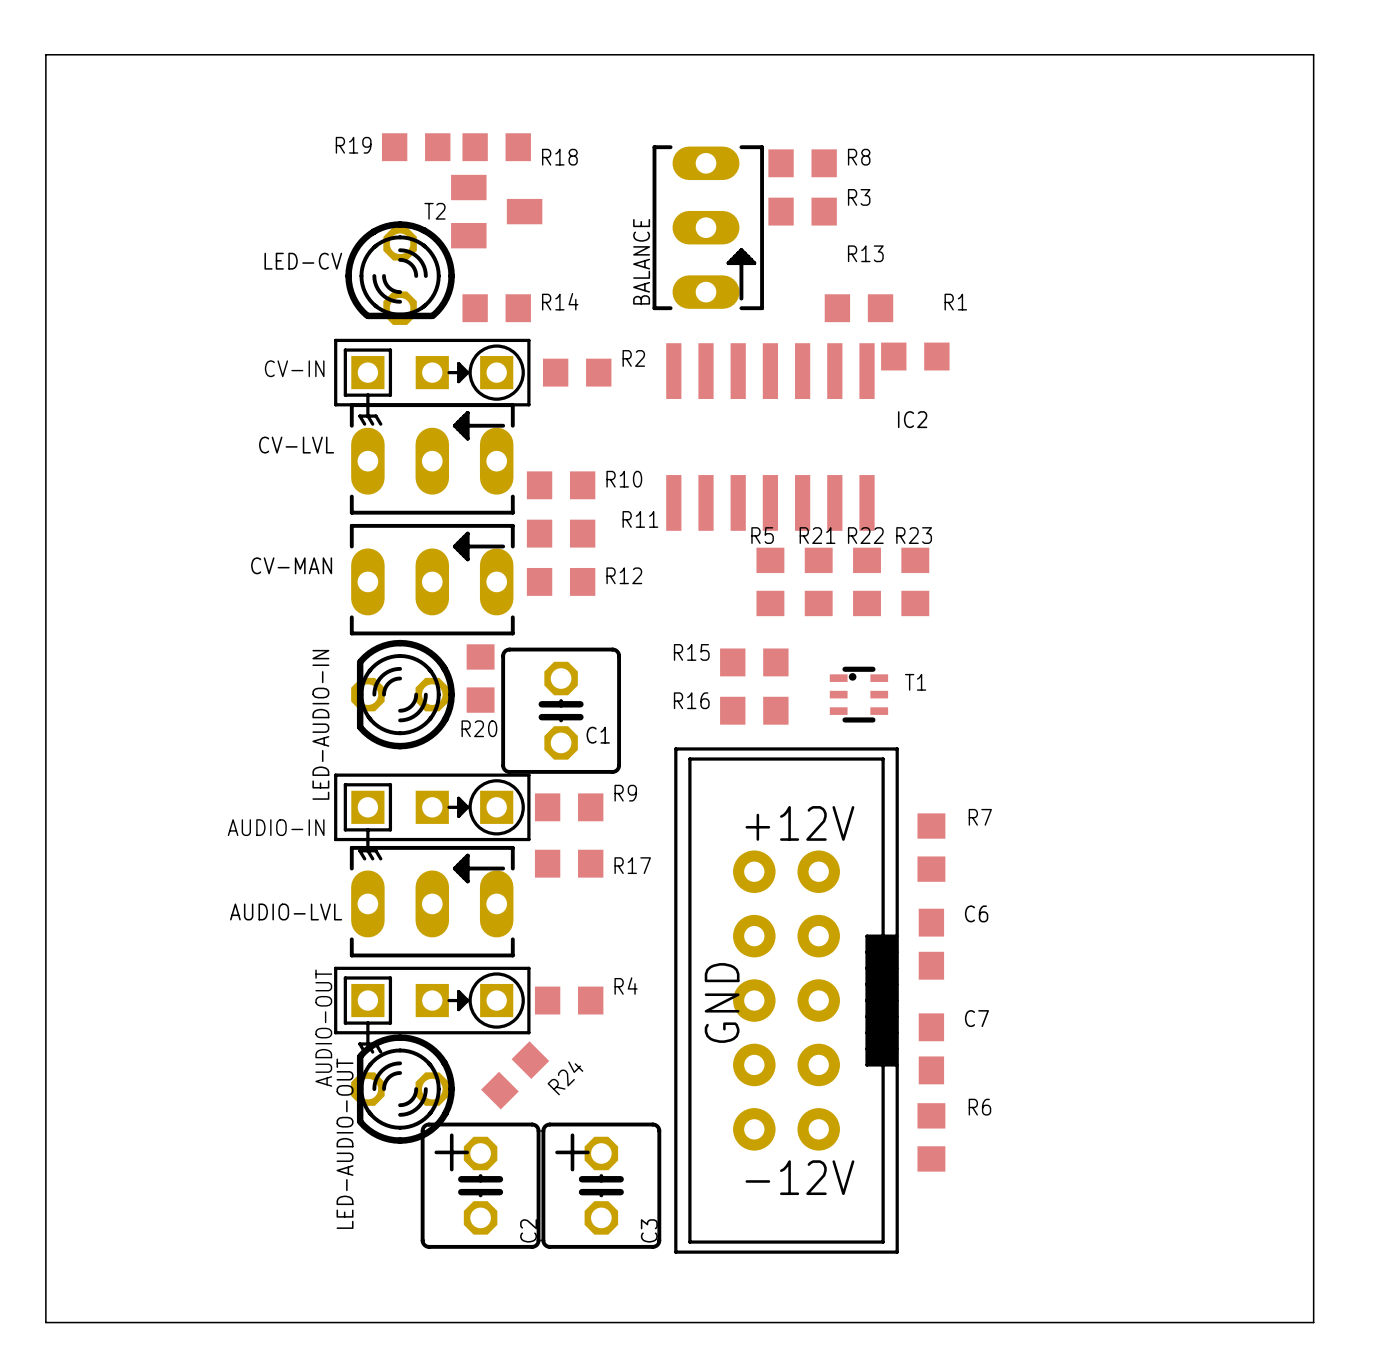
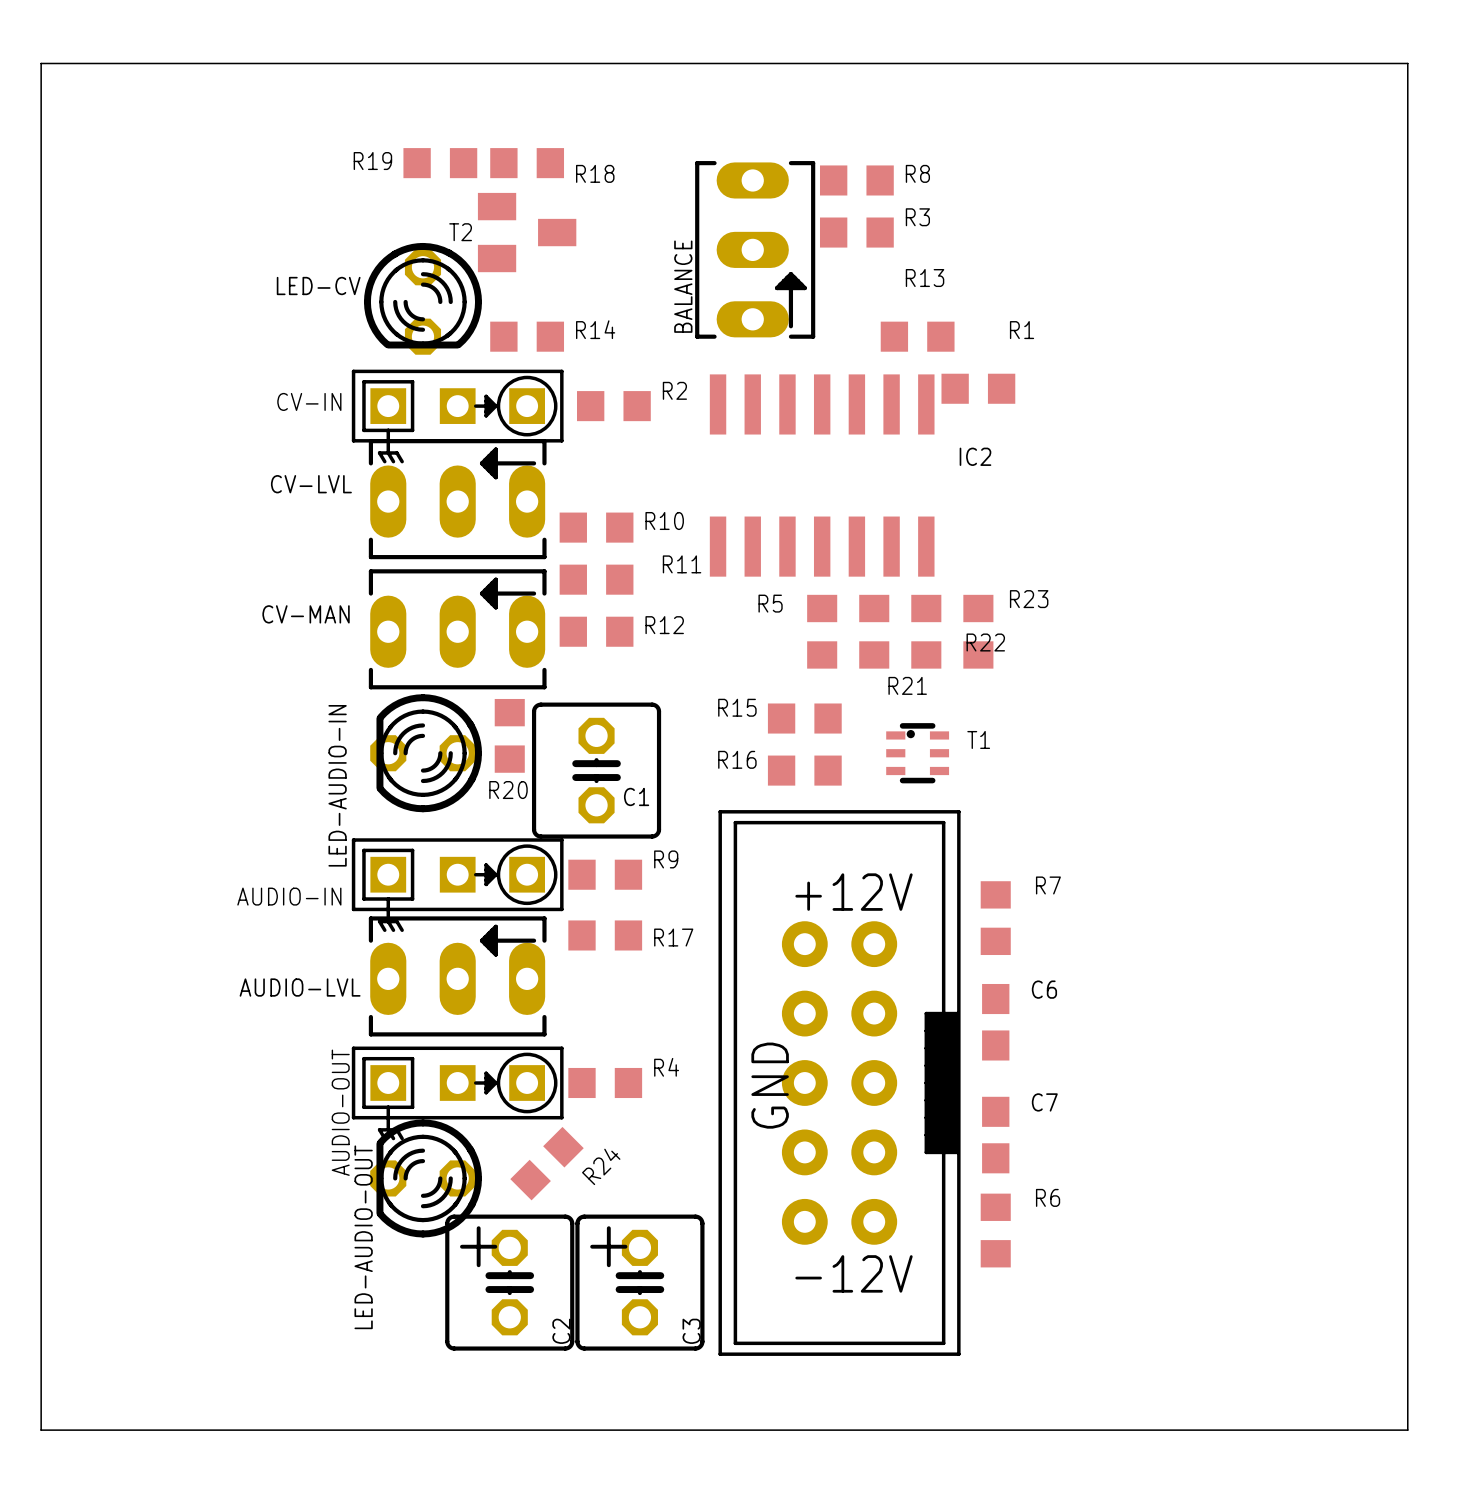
R5 name position: R5 (762, 535) -> R5 (770, 603)
R21 name position: R21 (817, 535) -> R21 (907, 685)
R22 name position: R22 (865, 535) -> R22 (985, 642)
R23 name position: R23 (914, 535) -> R23 (1029, 599)

